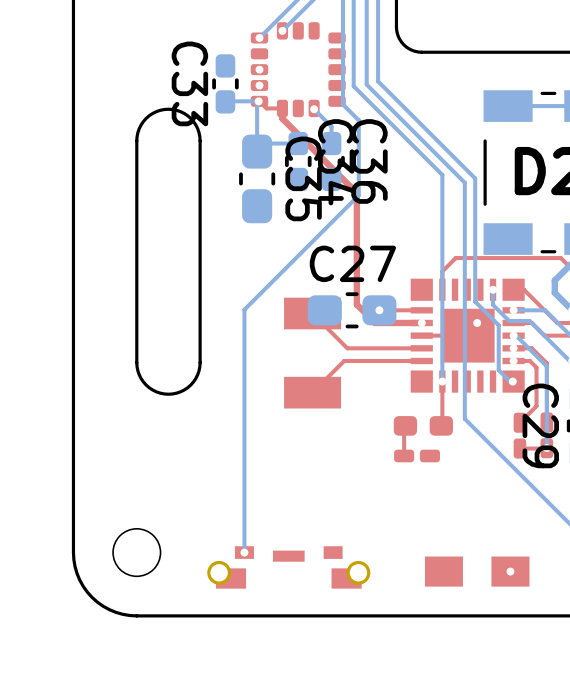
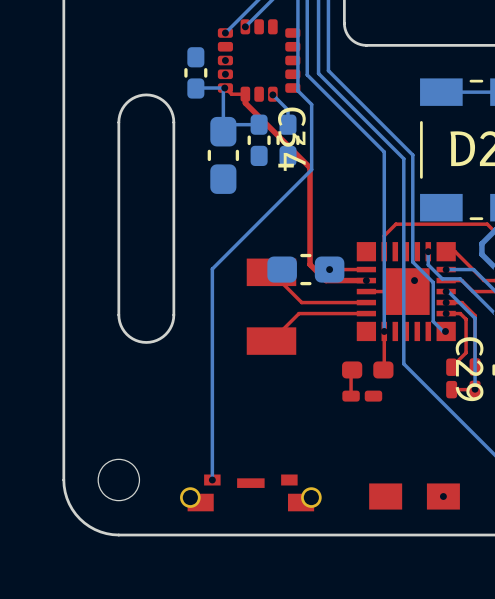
C33 name: C33 (189, 83) -> none
C36 name: C36 (369, 161) -> none
C35 name: C35 (303, 178) -> none
C27 name: C27 (352, 263) -> none

